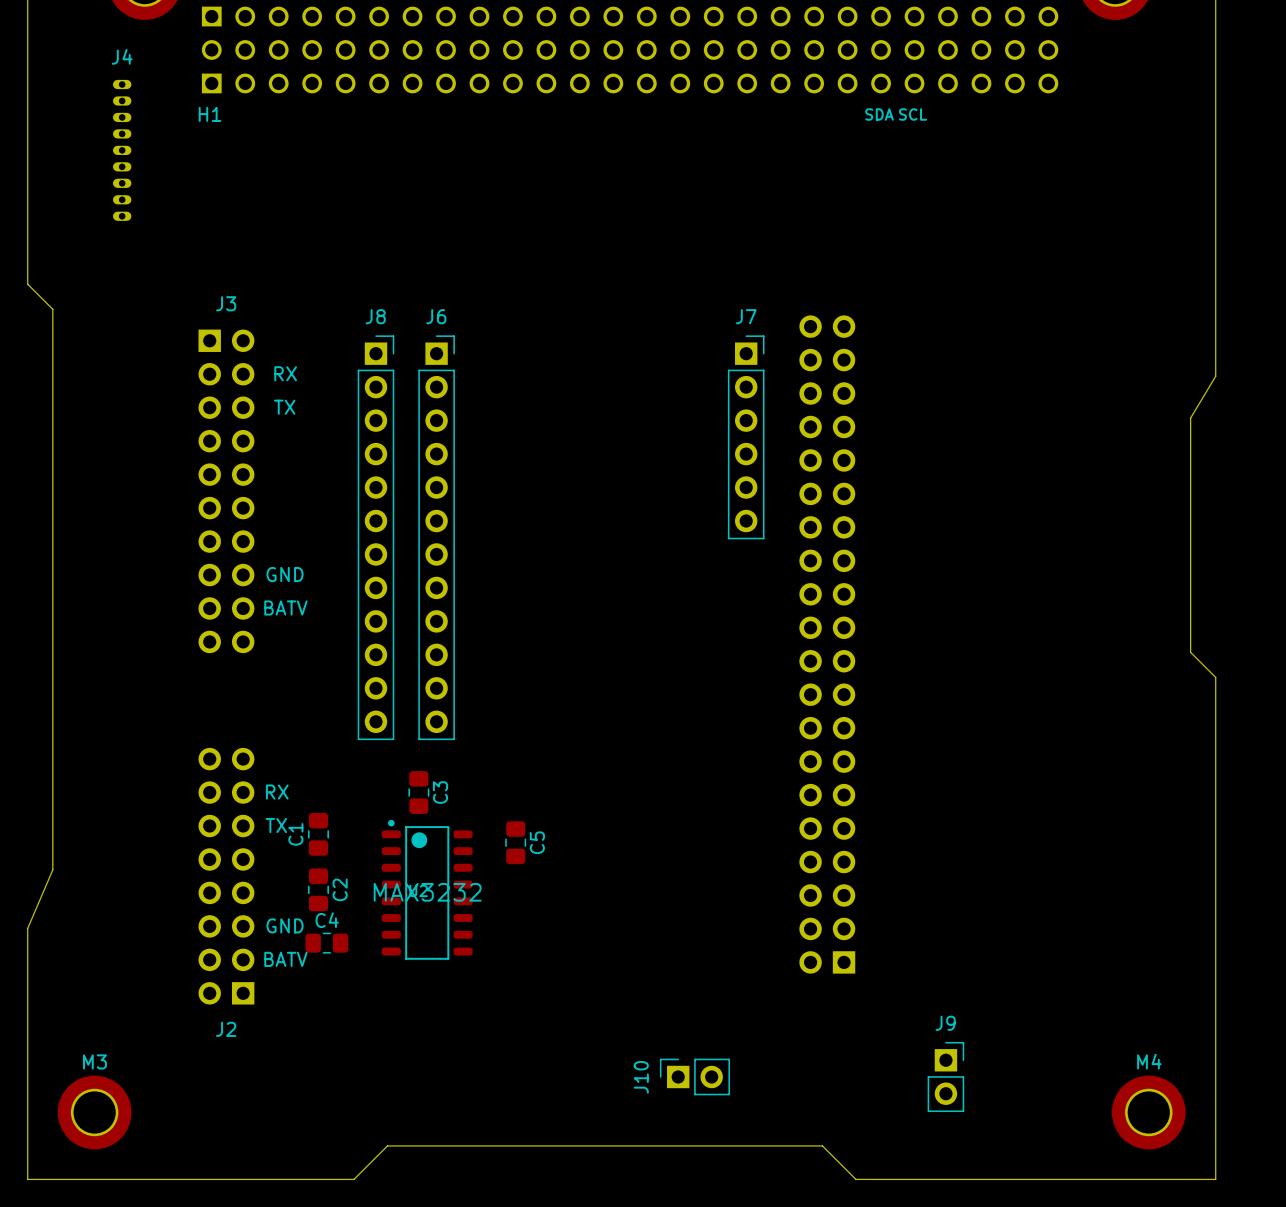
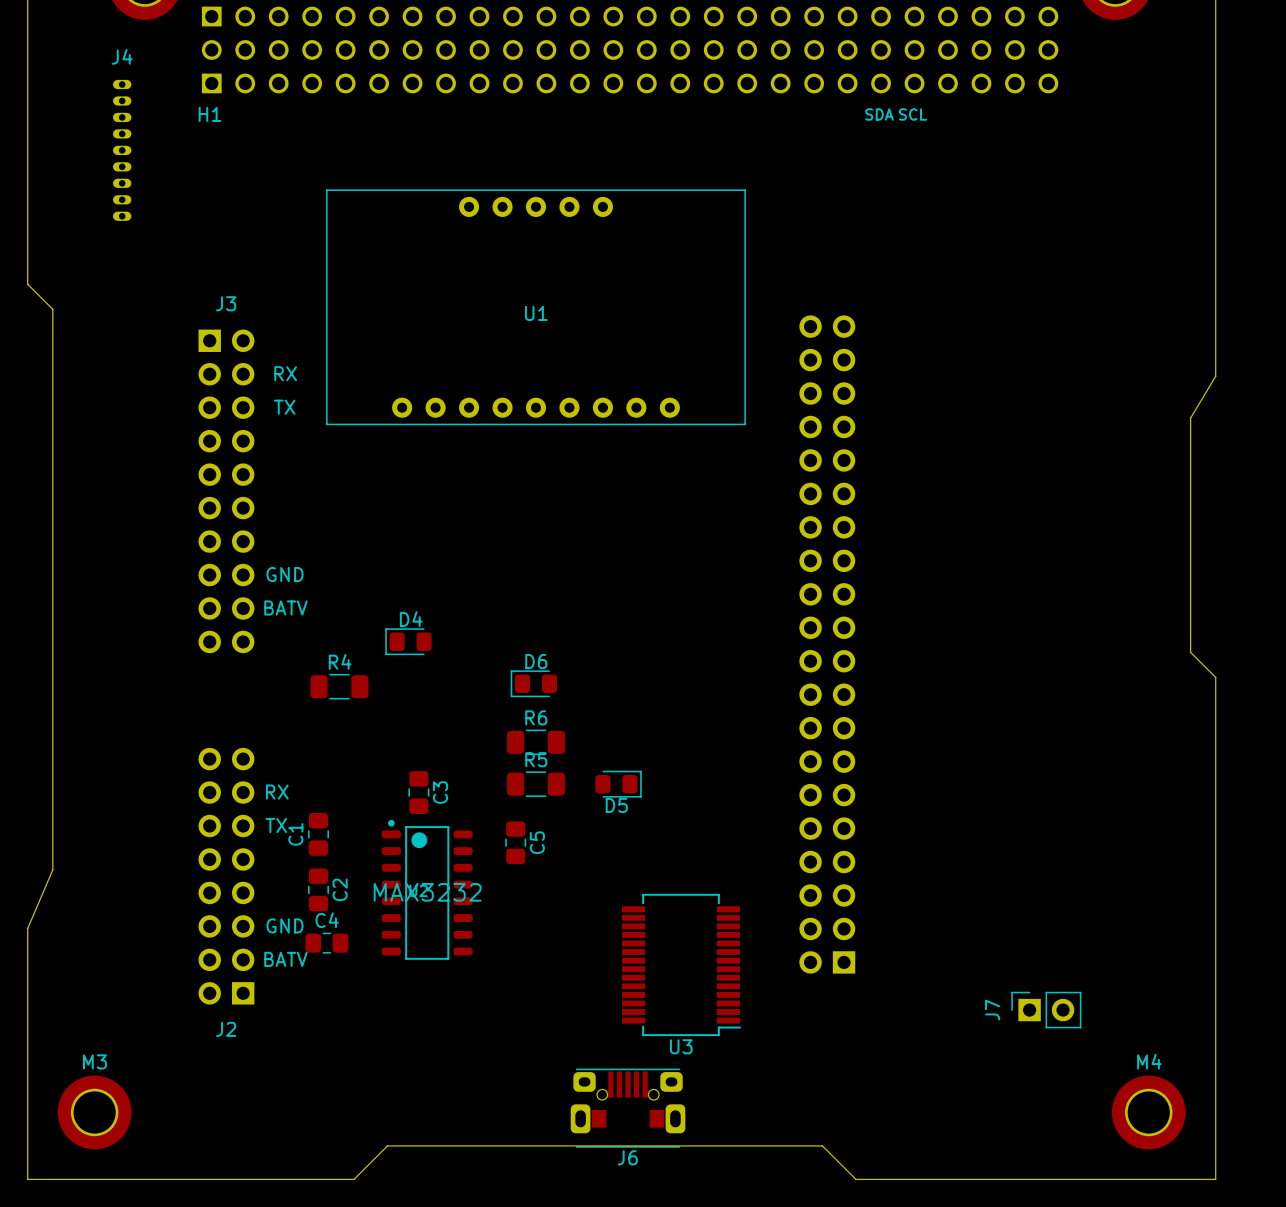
U1: none -> (536, 307)
J6 name position: J6 (436, 316) -> J6 (627, 1157)
J7 name position: J7 (746, 316) -> J7 (992, 1010)
J6 footprint: [418, 335, 455, 741] -> [570, 1068, 686, 1148]
J7 footprint: [727, 335, 765, 540] -> [1011, 991, 1082, 1029]
J8: (375, 537) -> none
D4: none -> (408, 641)
D6: none -> (533, 683)
R4: none -> (339, 686)
R6: none -> (536, 742)
R5: none -> (536, 784)
D5: none -> (618, 784)
U3: none -> (681, 964)
J10: (694, 1076) -> none
J9: (945, 1076) -> none

